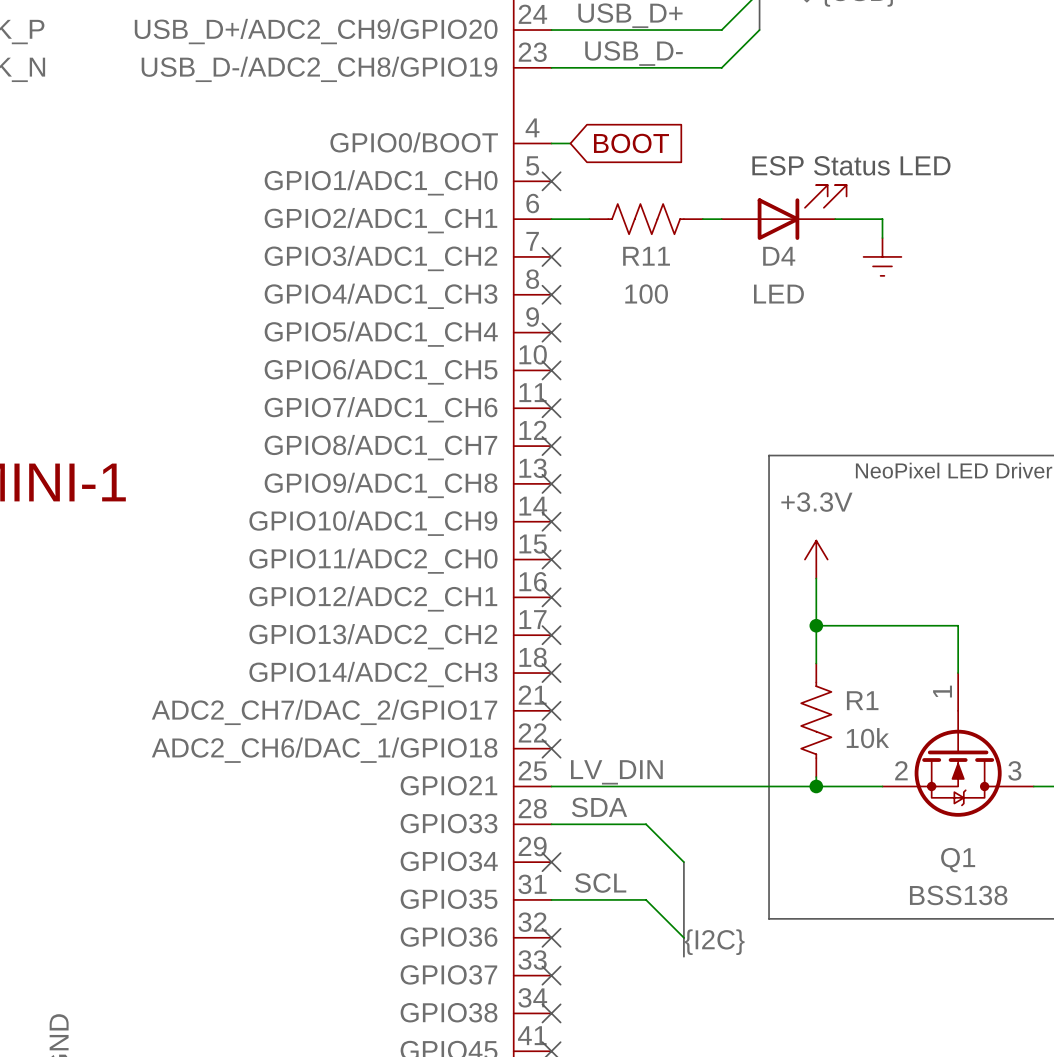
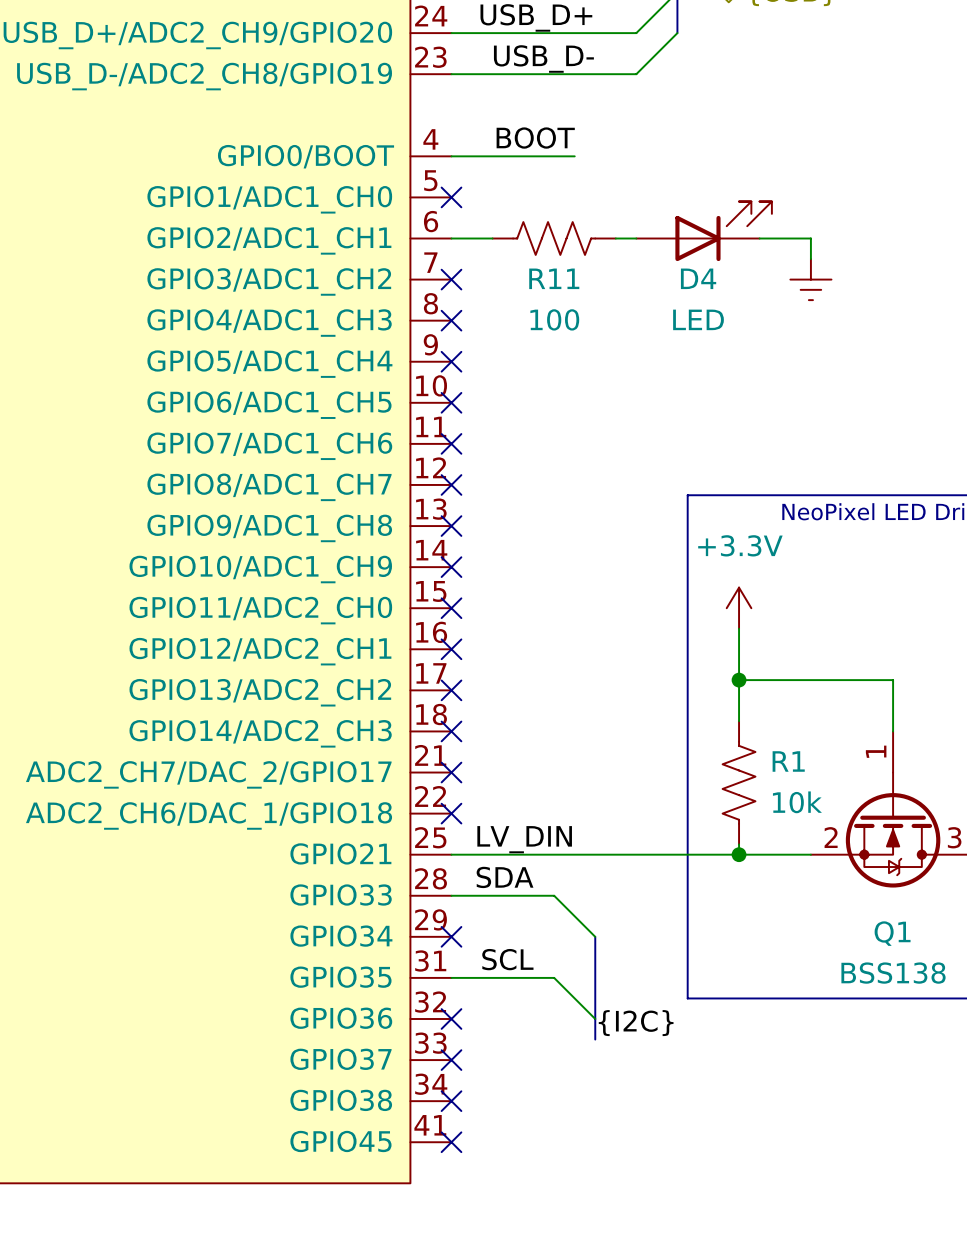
label: none -> BOOT (535, 138)
wire: none -> (472, 156) (574, 156)
global label: BOOT (631, 143) -> none
text: ESP Status LED (851, 165) -> none

